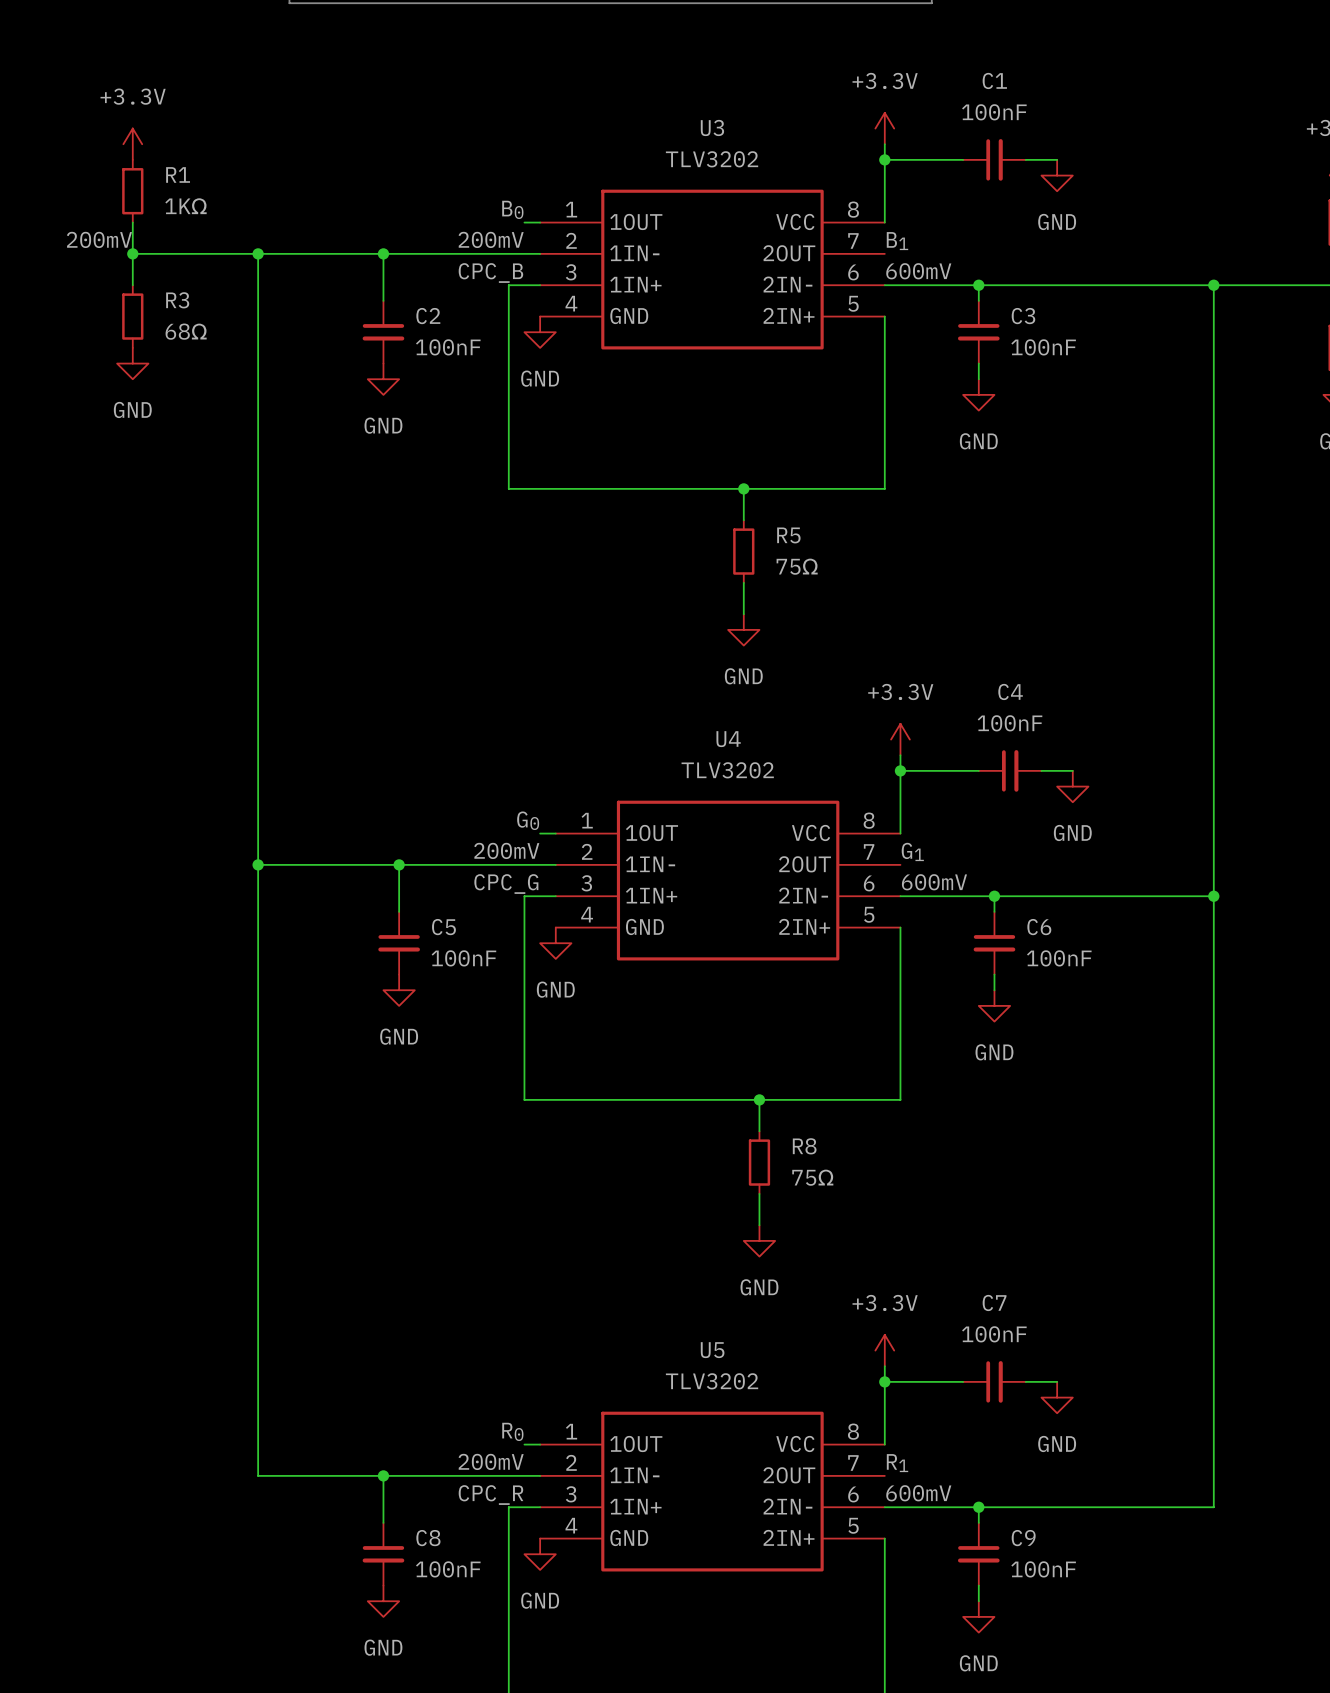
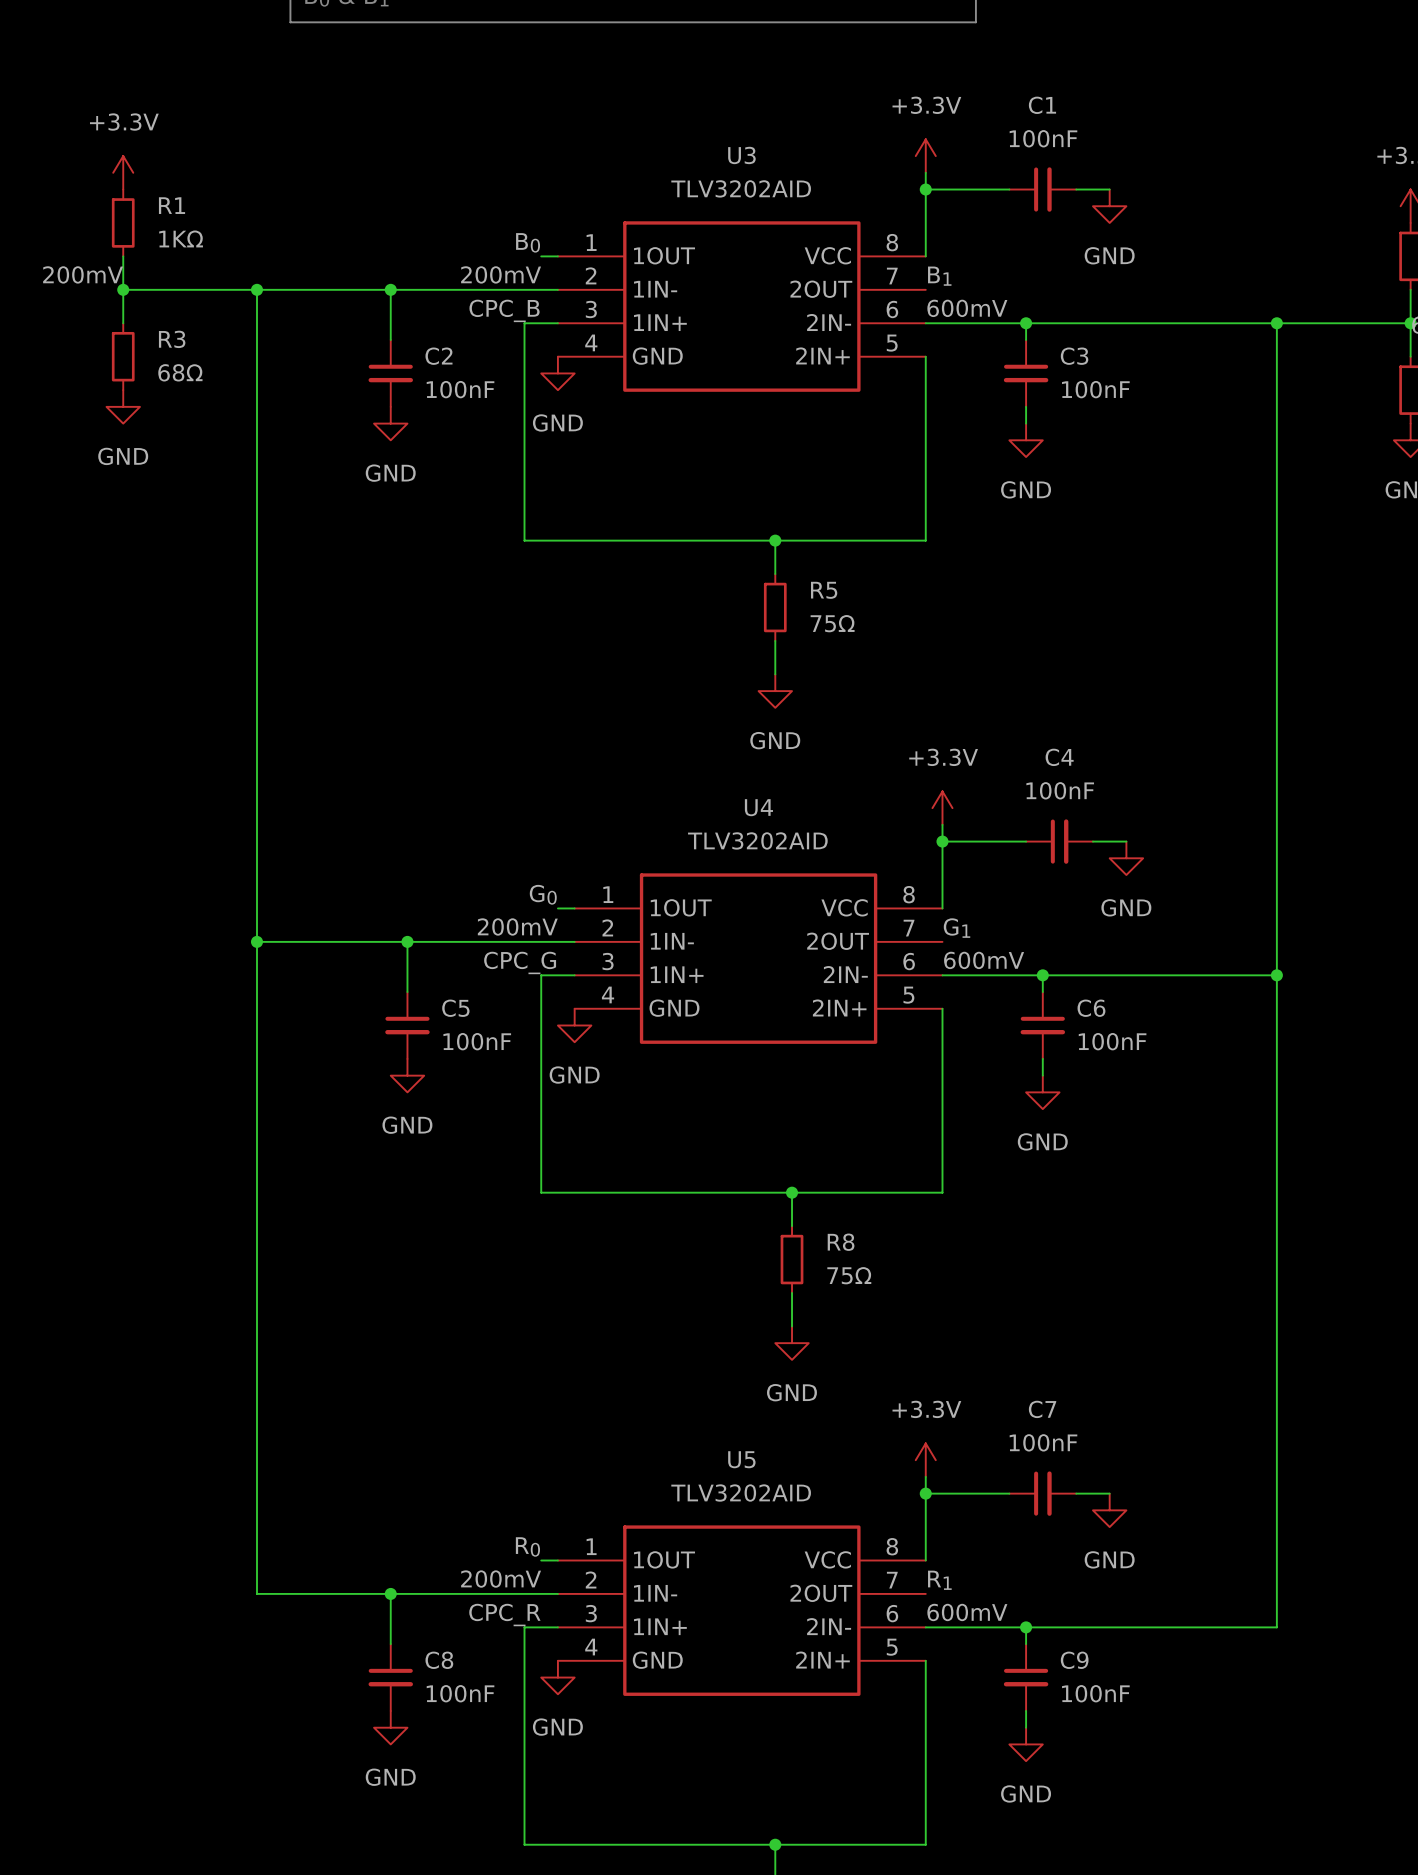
U3 value: TLV3202 (712, 159) -> TLV3202AID (741, 188)
U4 value: TLV3202 (727, 770) -> TLV3202AID (757, 840)
U5 value: TLV3202 (712, 1381) -> TLV3202AID (741, 1493)

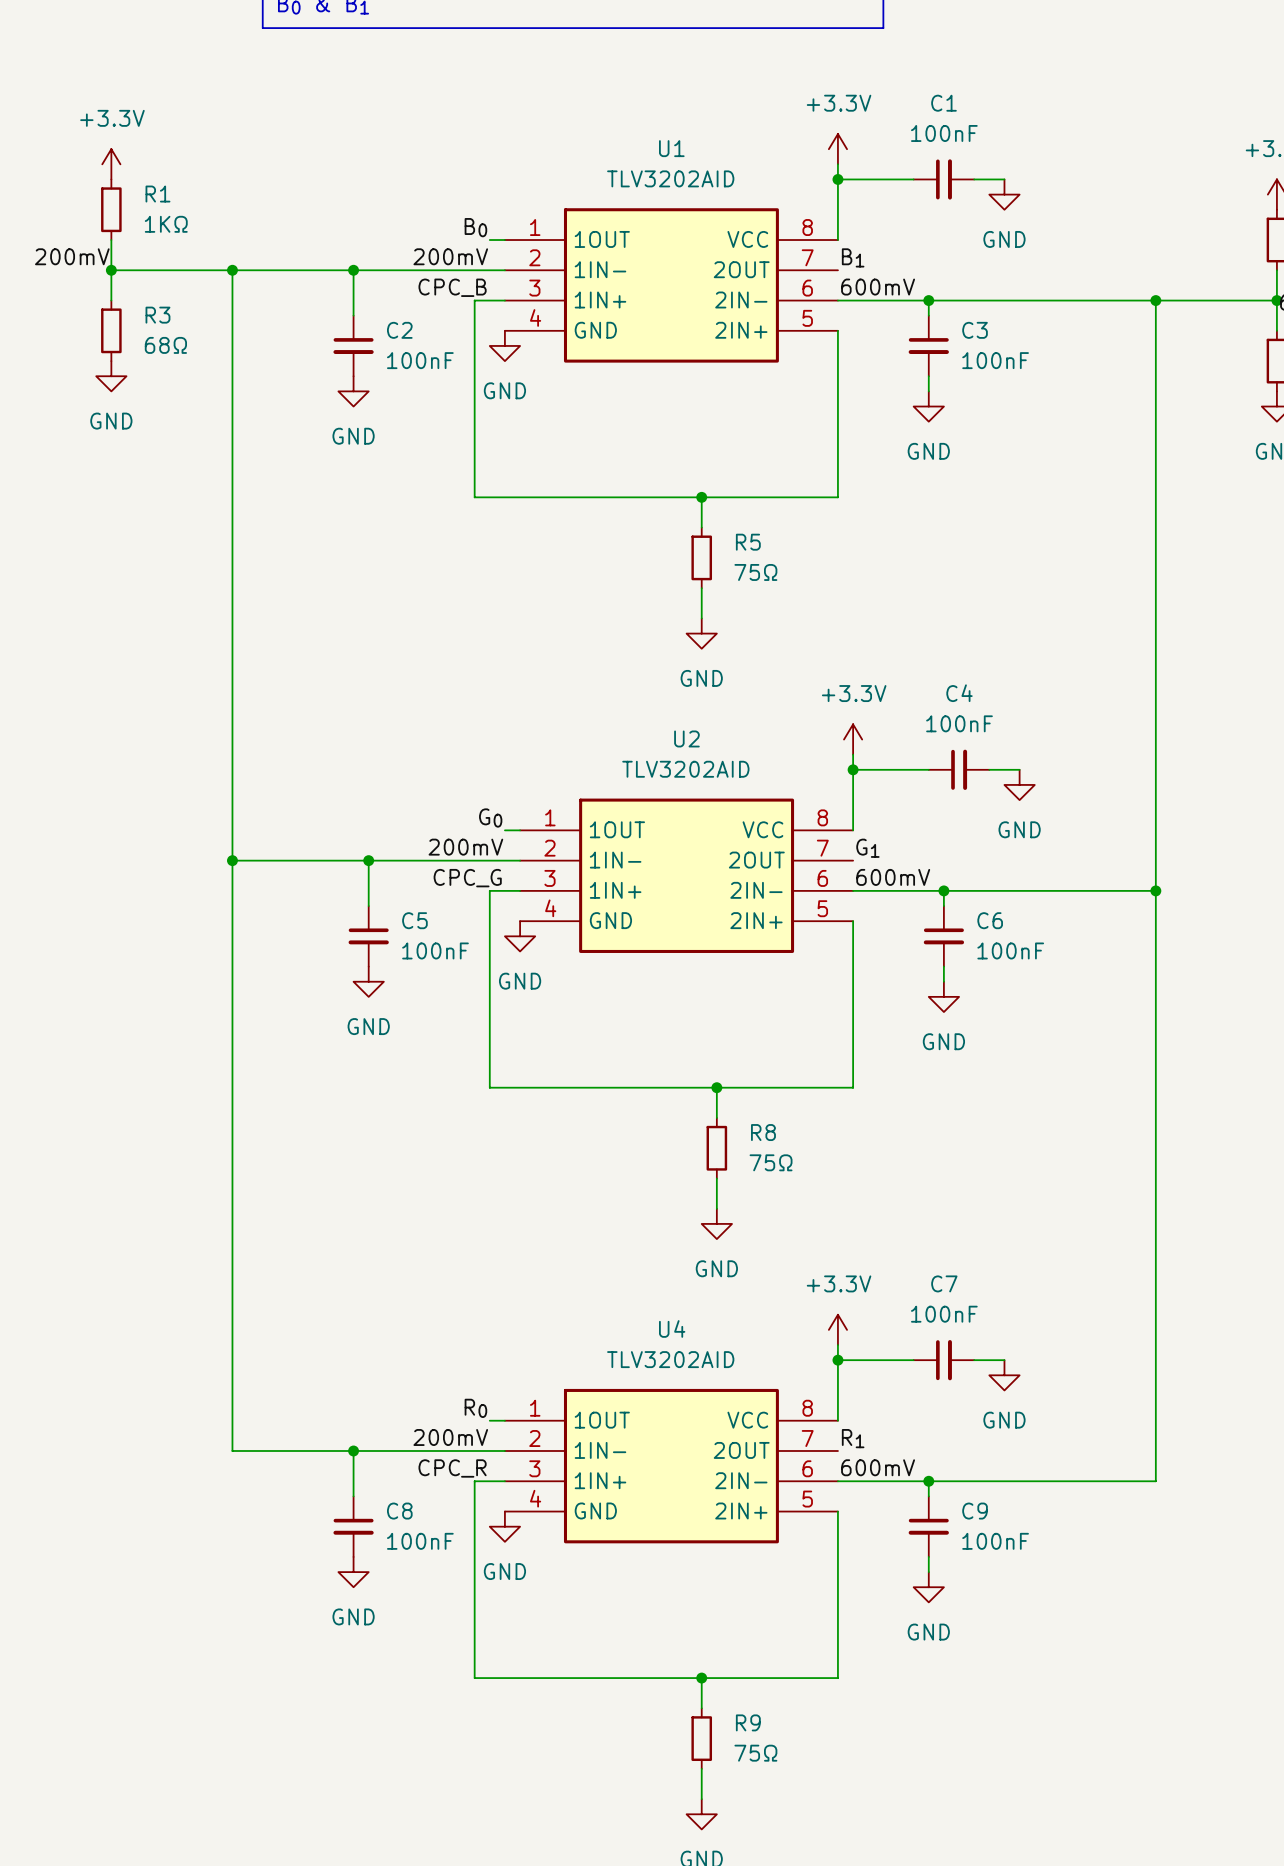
U3 name: U3 (741, 155) -> U1 (671, 148)
U4 name: U4 (758, 807) -> U2 (686, 738)
U5 name: U5 (741, 1459) -> U4 (672, 1328)

